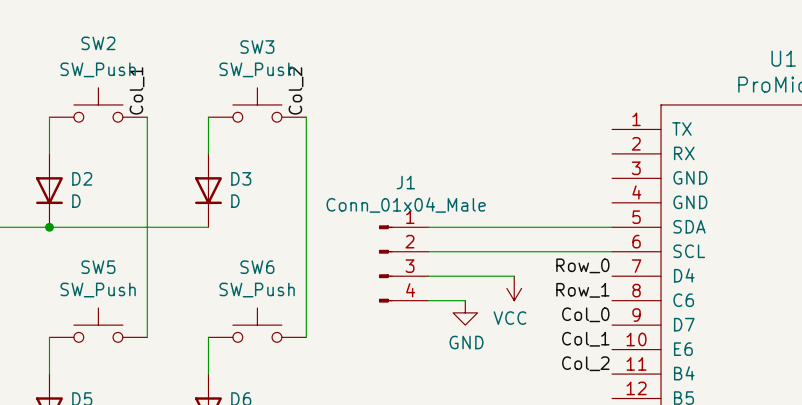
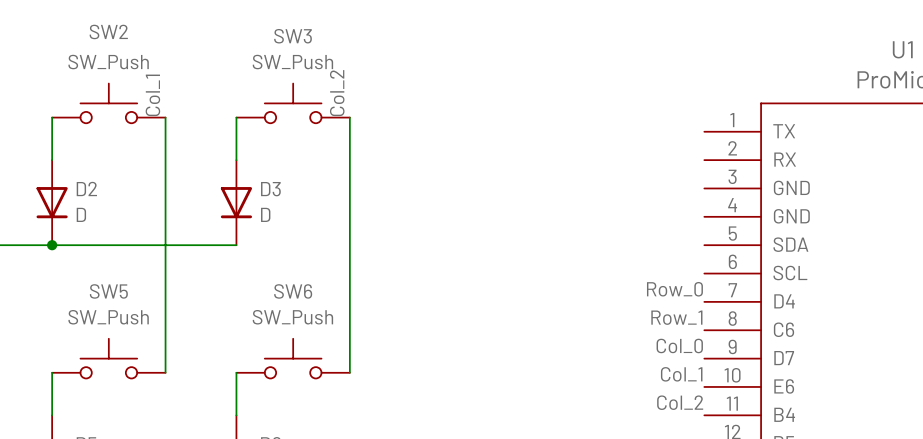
wire: (428, 227) (612, 227) -> none
wire: (428, 251) (612, 251) -> none
J1: Conn_01x04_Male (403, 263) -> none
wire: (428, 276) (514, 276) -> none
power symbol: VCC (514, 288) -> none
wire: (428, 300) (465, 300) -> none
power symbol: GND (465, 312) -> none

